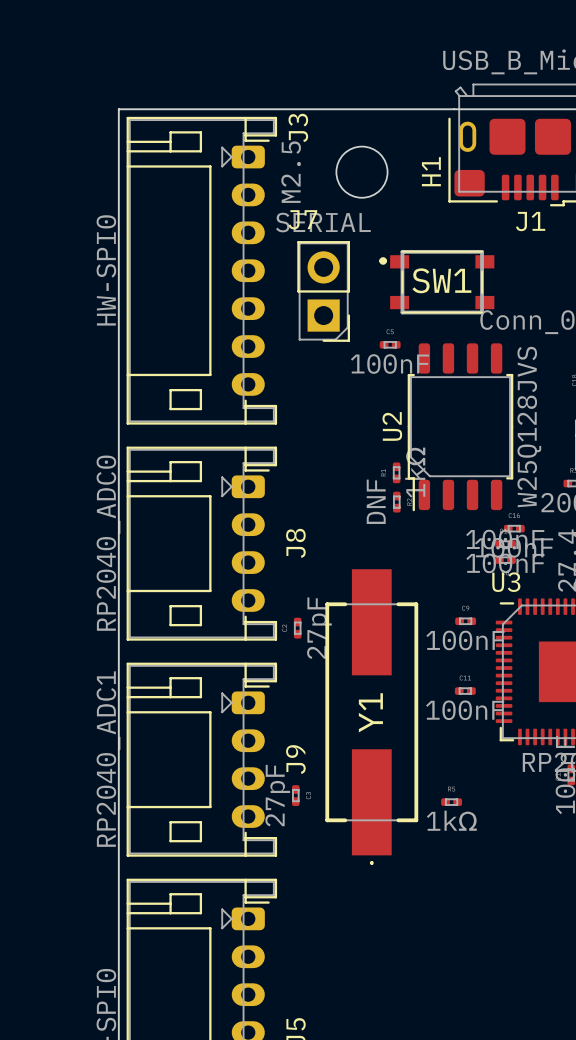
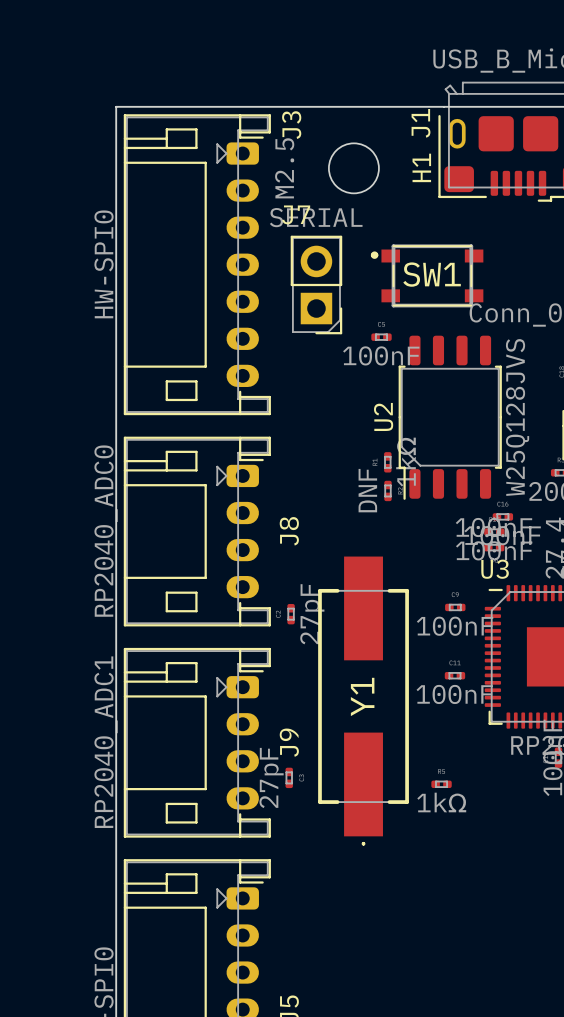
J1 name rotation: 0° (530, 221) -> 90° counterclockwise (420, 123)
J1 name position: J1 (530, 221) -> J1 (420, 123)

